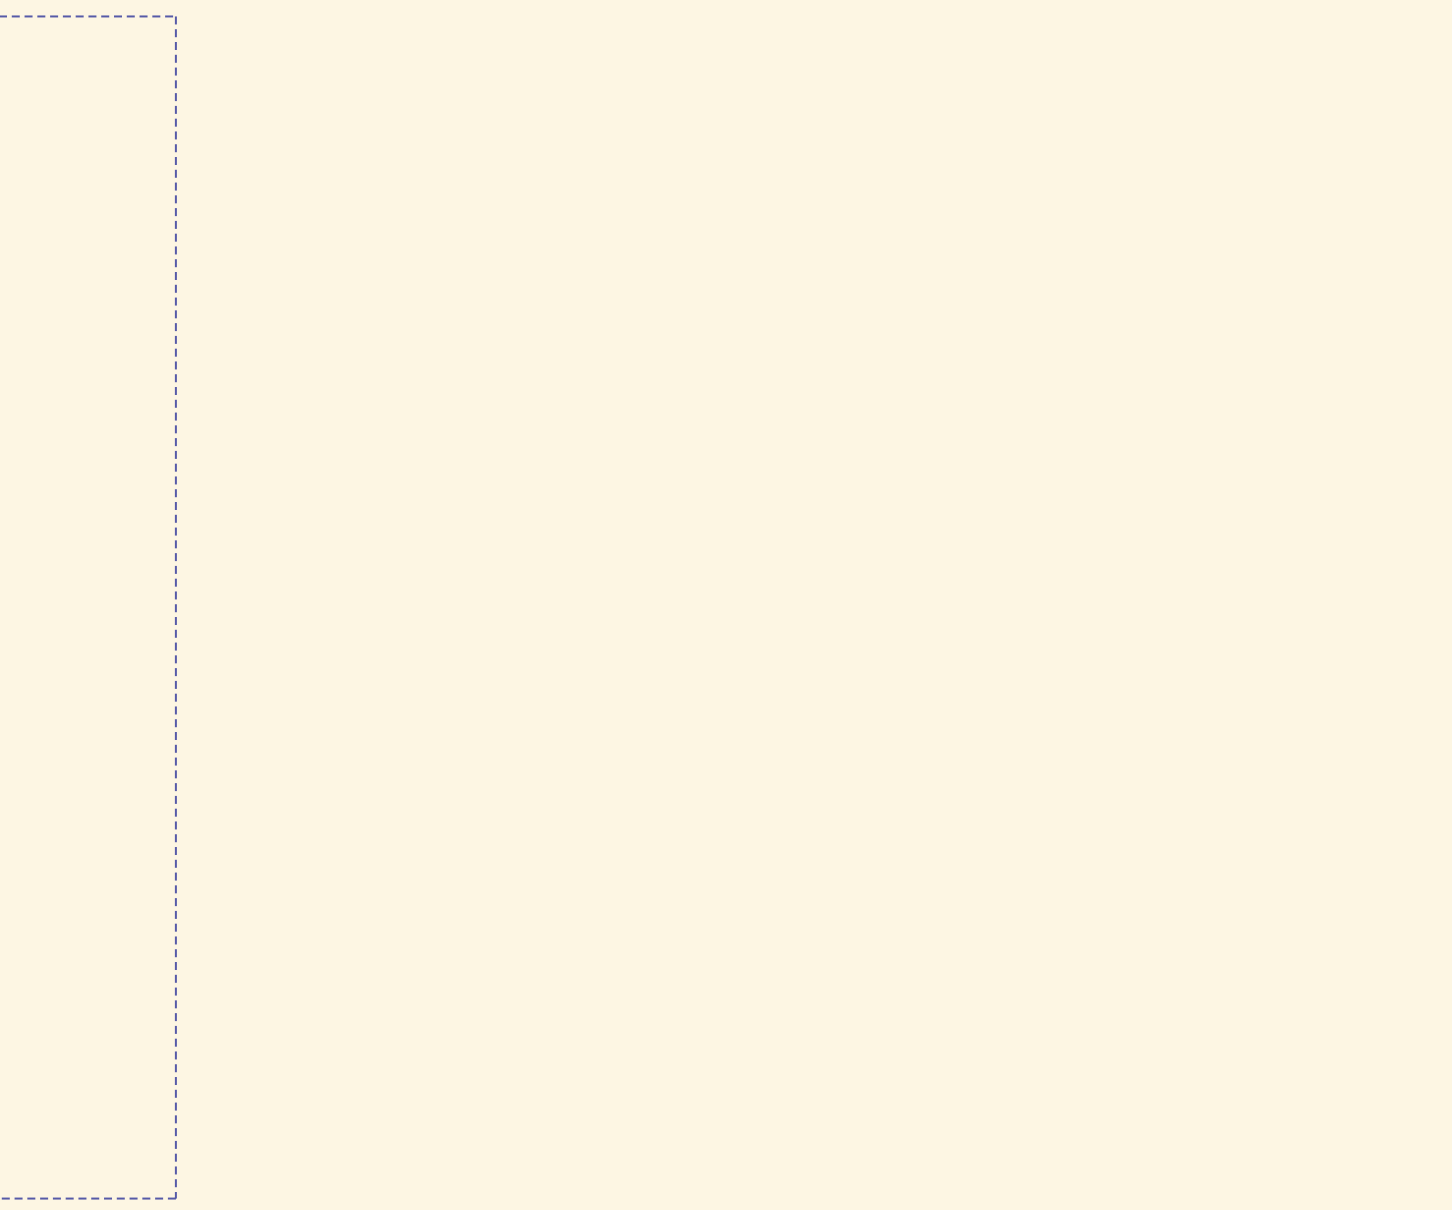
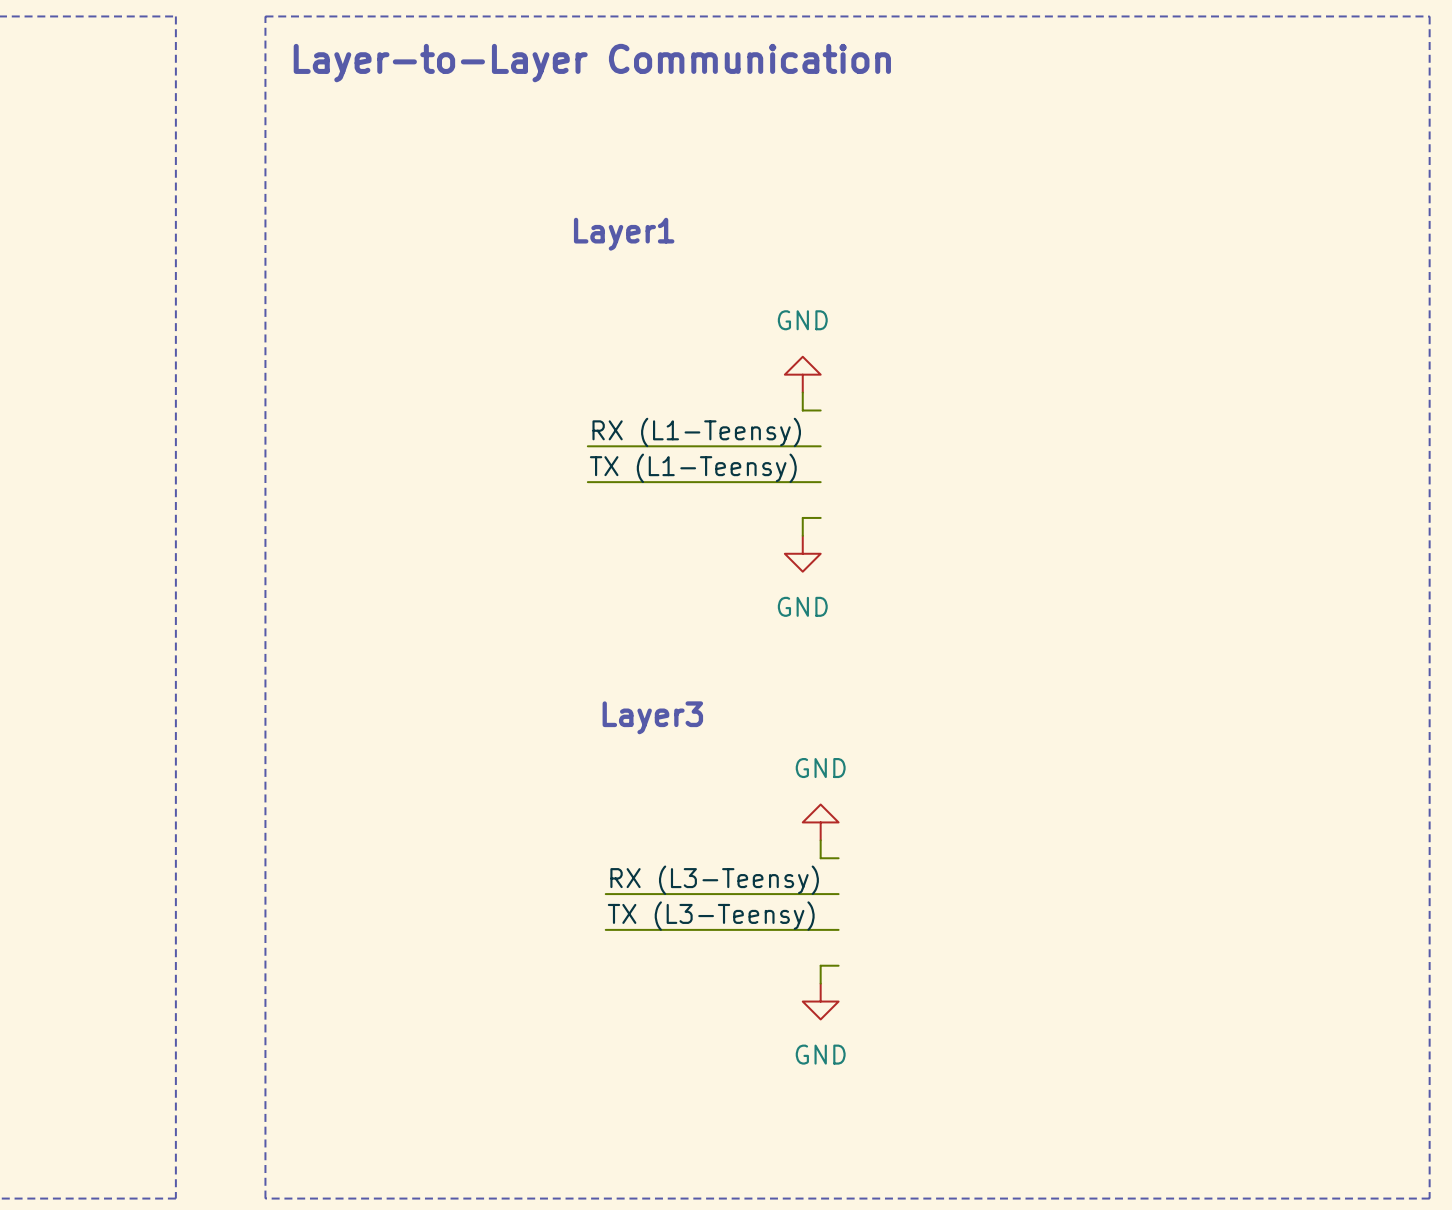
line: none -> (265, 16) (1429, 16) (1429, 1198) (265, 1198) (265, 16)
text: none -> Layer-to-Layer Communication (592, 63)
text: none -> Layer1 (624, 234)
power symbol: none -> GND (802, 374)
wire: none -> (802, 392) (802, 410) (820, 410)
label: none -> RX (L1-Teensy) (696, 432)
wire: none -> (587, 446) (820, 446)
label: none -> TX (L1-Teensy) (693, 468)
wire: none -> (587, 482) (820, 482)
wire: none -> (820, 517) (802, 517) (802, 535)
power symbol: none -> GND (802, 553)
text: none -> Layer3 (652, 717)
power symbol: none -> GND (820, 822)
wire: none -> (820, 840) (820, 858) (838, 858)
label: none -> RX (L3-Teensy) (714, 880)
wire: none -> (605, 894) (838, 894)
label: none -> TX (L3-Teensy) (711, 916)
wire: none -> (605, 929) (838, 929)
wire: none -> (838, 965) (820, 965) (820, 983)
power symbol: none -> GND (820, 1001)

